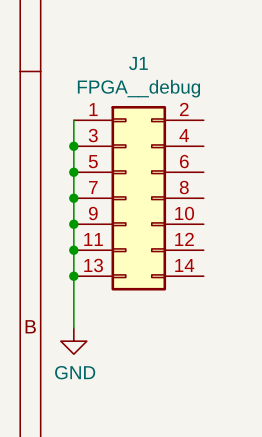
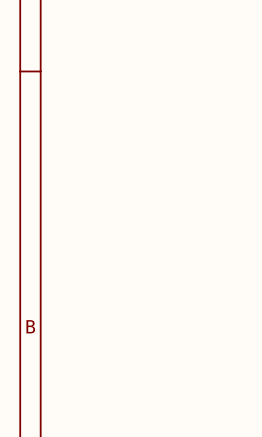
wire: (73, 120) (73, 328) -> none
junction: (73, 146) -> none
junction: (73, 172) -> none
junction: (73, 198) -> none
J1: FPGA__debug (138, 198) -> none
junction: (73, 224) -> none
junction: (73, 250) -> none
junction: (73, 276) -> none
power symbol: GND (73, 341) -> none

